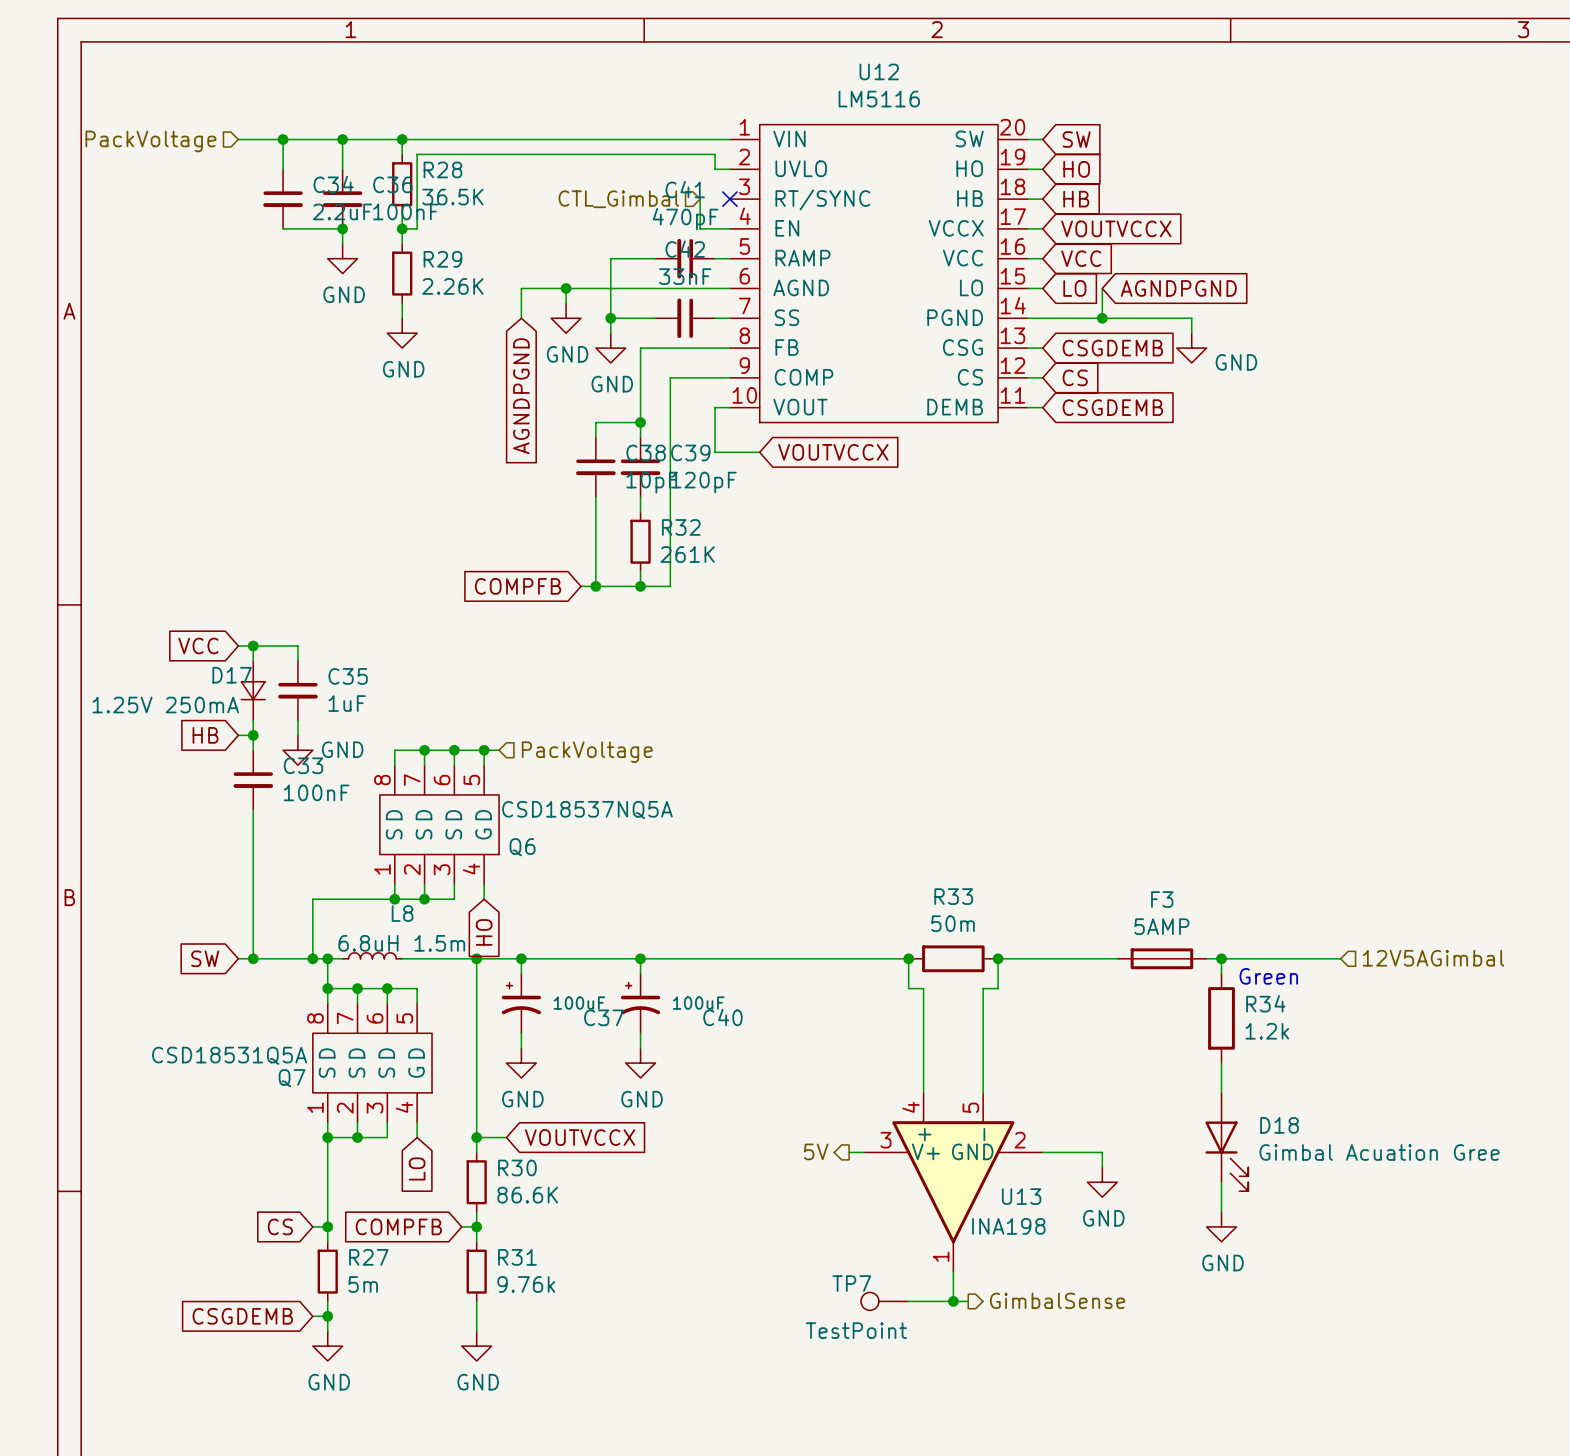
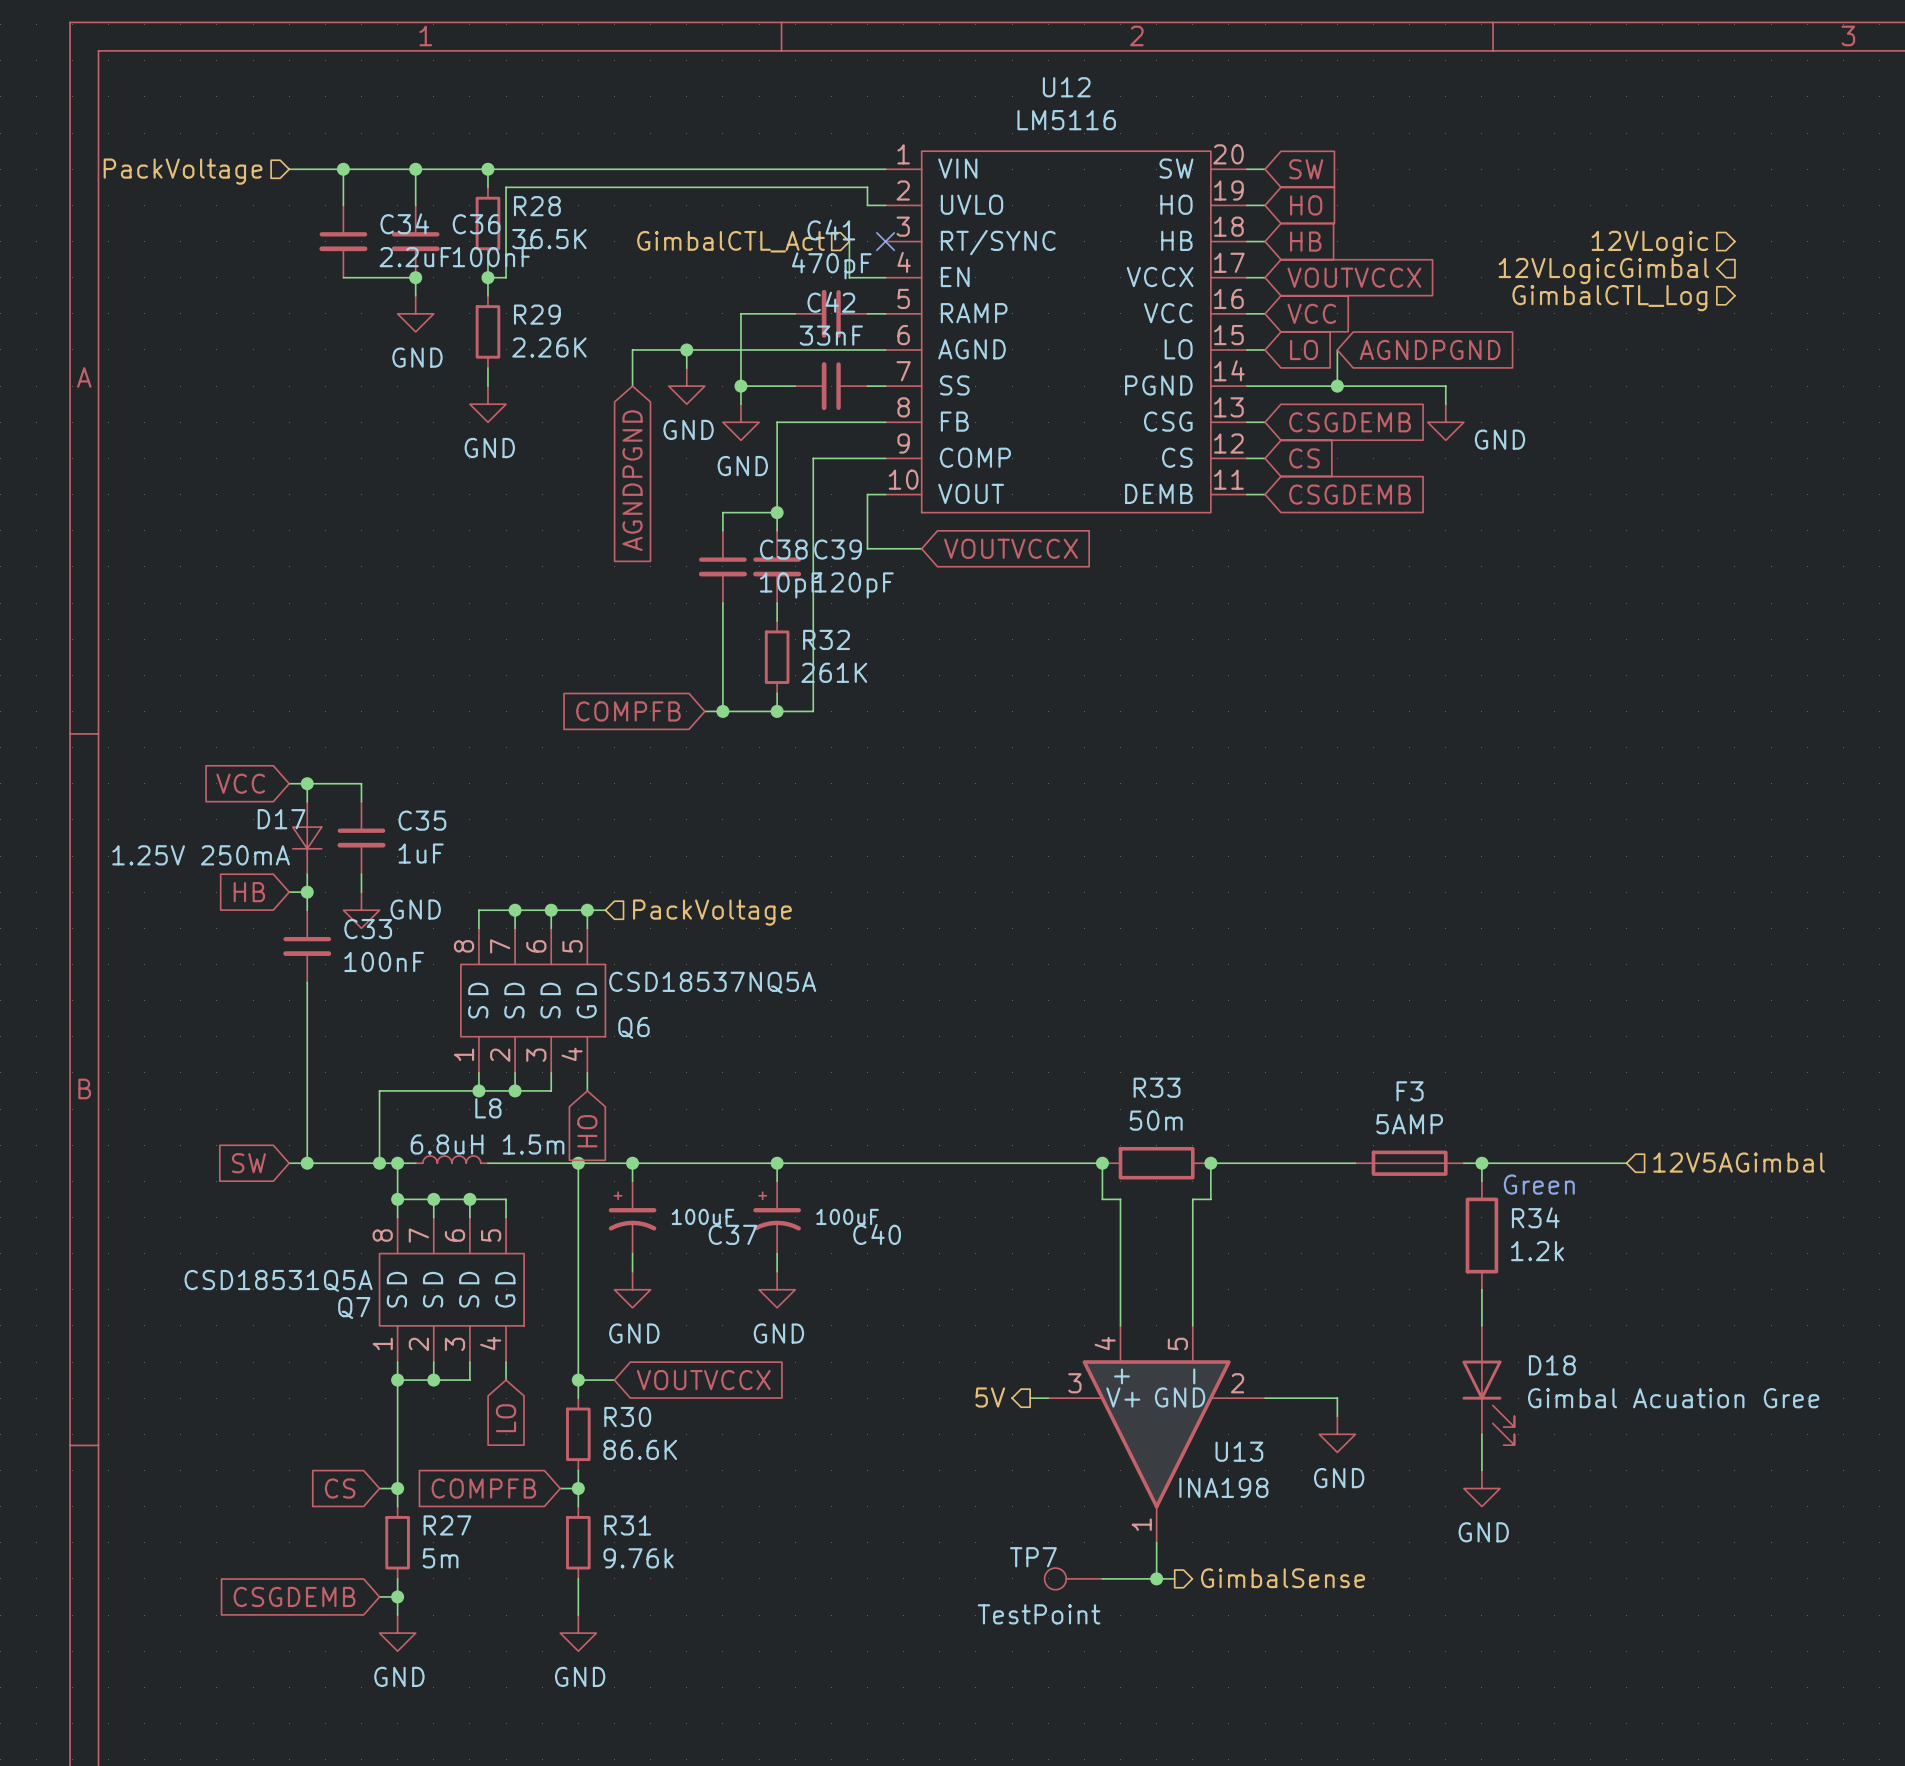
hierarchical label: CTL_Gimbal (618, 199) -> GimbalCTL_Act (730, 241)
hierarchical label: none -> 12VLogic (1649, 243)
hierarchical label: none -> 12VLogicGimbal (1603, 271)
hierarchical label: none -> GimbalCTL_Log (1609, 298)

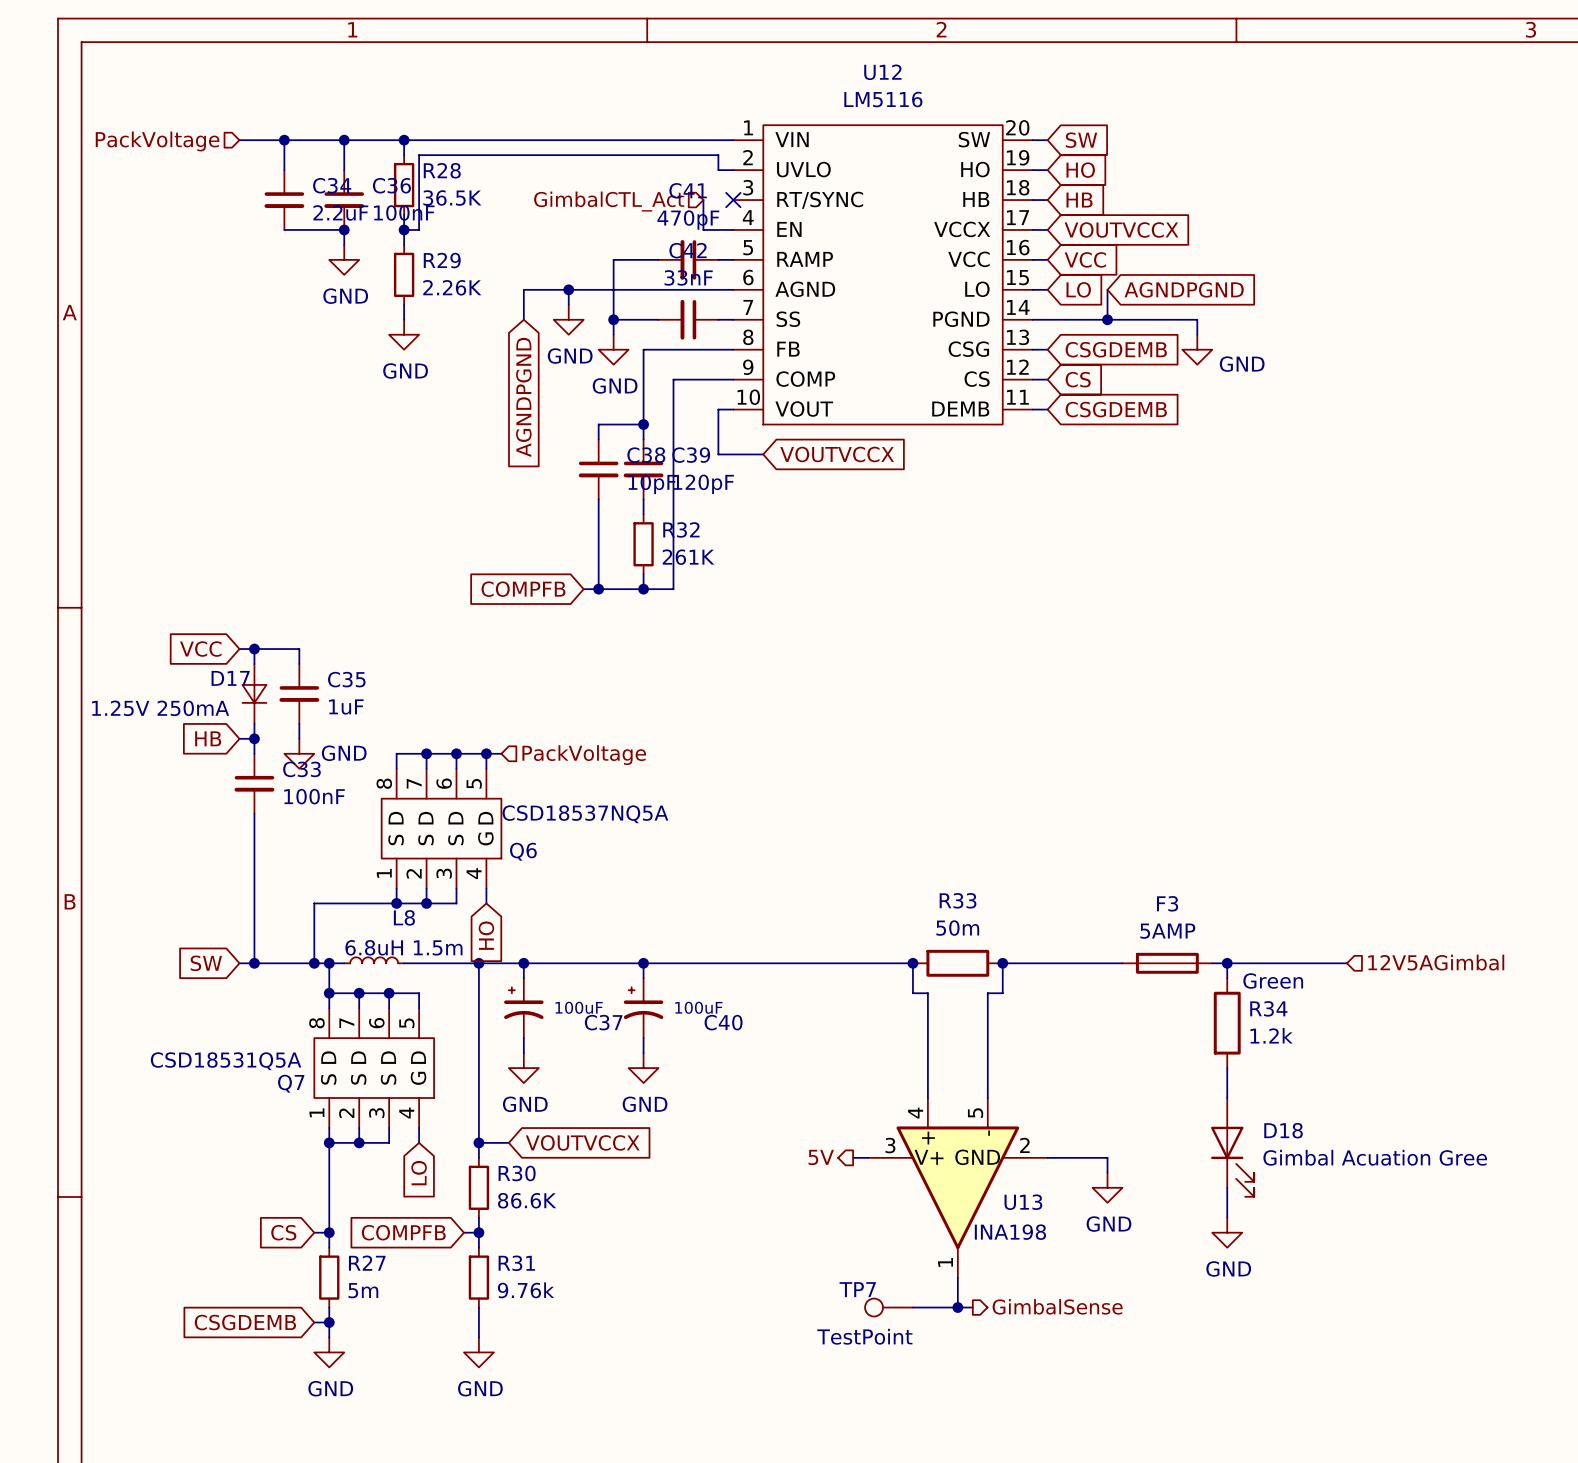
hierarchical label: 12VLogic (1649, 243) -> none
hierarchical label: 12VLogicGimbal (1603, 271) -> none
hierarchical label: GimbalCTL_Log (1609, 298) -> none

